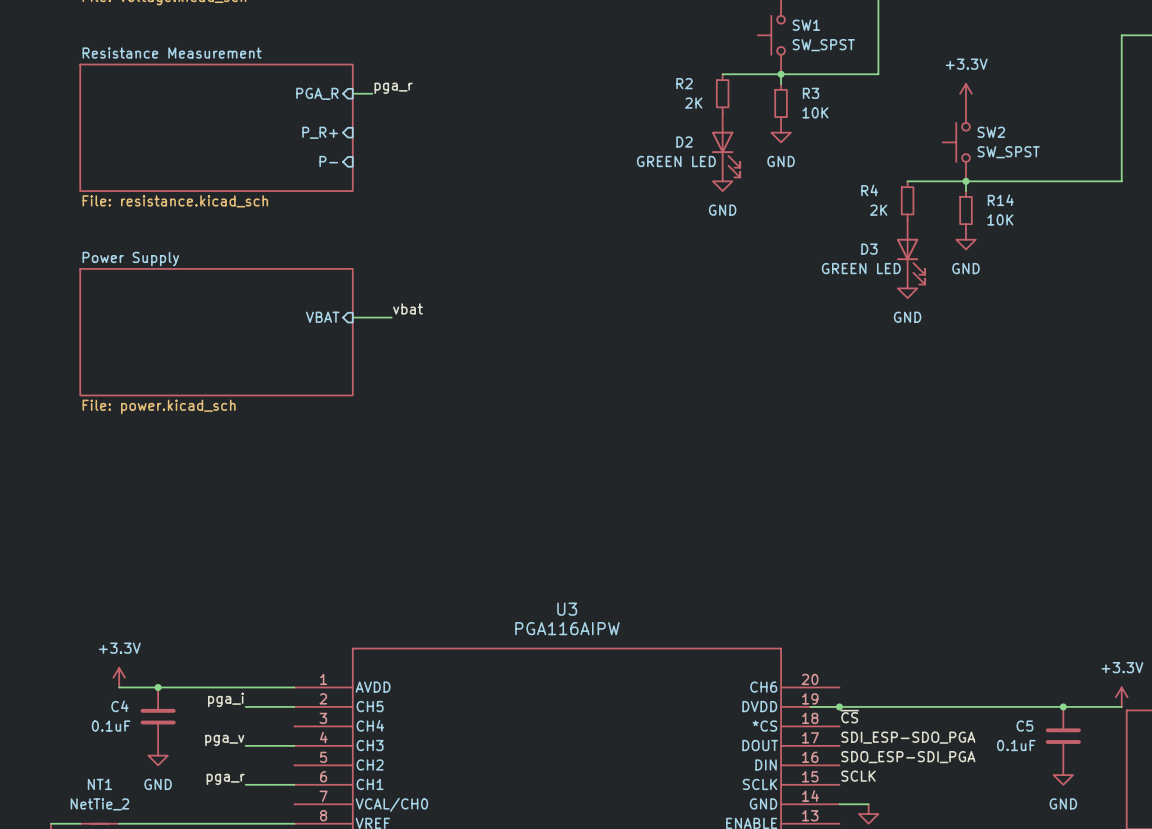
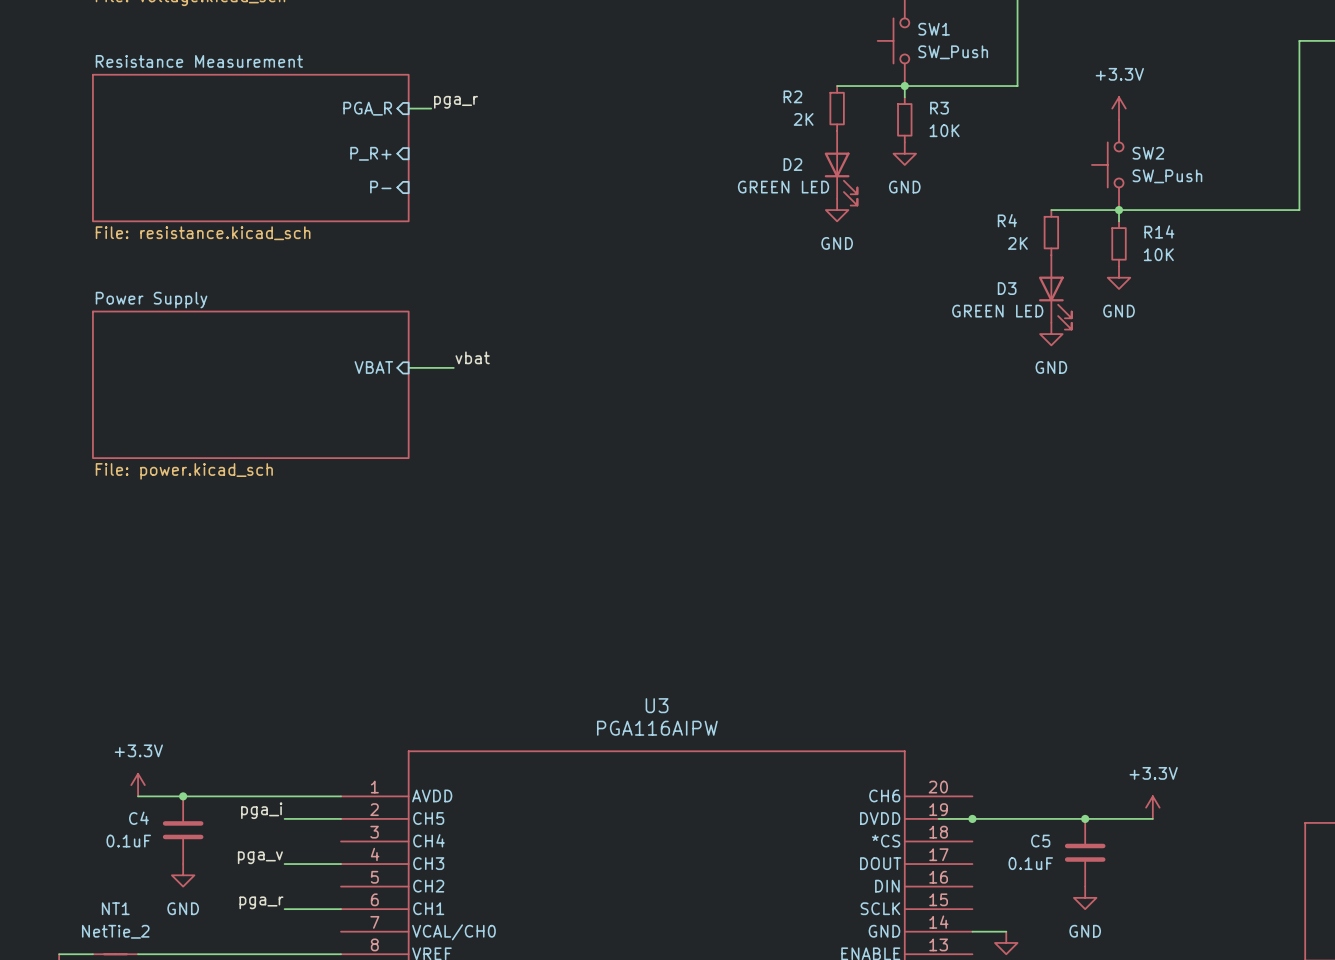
SW1 value: SW_SPST (823, 45) -> SW_Push (953, 52)
SW2 value: SW_SPST (1008, 152) -> SW_Push (1167, 176)
power symbol position: +3.3V (1121, 697) -> +3.3V (1152, 807)
junction: none -> (1085, 818)
wire: (995, 706) (1121, 706) -> none
junction: (1063, 706) -> none
label: ~{CS} (849, 716) -> none
C5 position: (1063, 736) -> (1085, 852)
label: SDI_ESP-SDO_PGA (908, 737) -> none
label: SDO_ESP-SDI_PGA (908, 757) -> none
power symbol position: GND (1063, 775) -> GND (1085, 897)
label: SCLK (858, 776) -> none

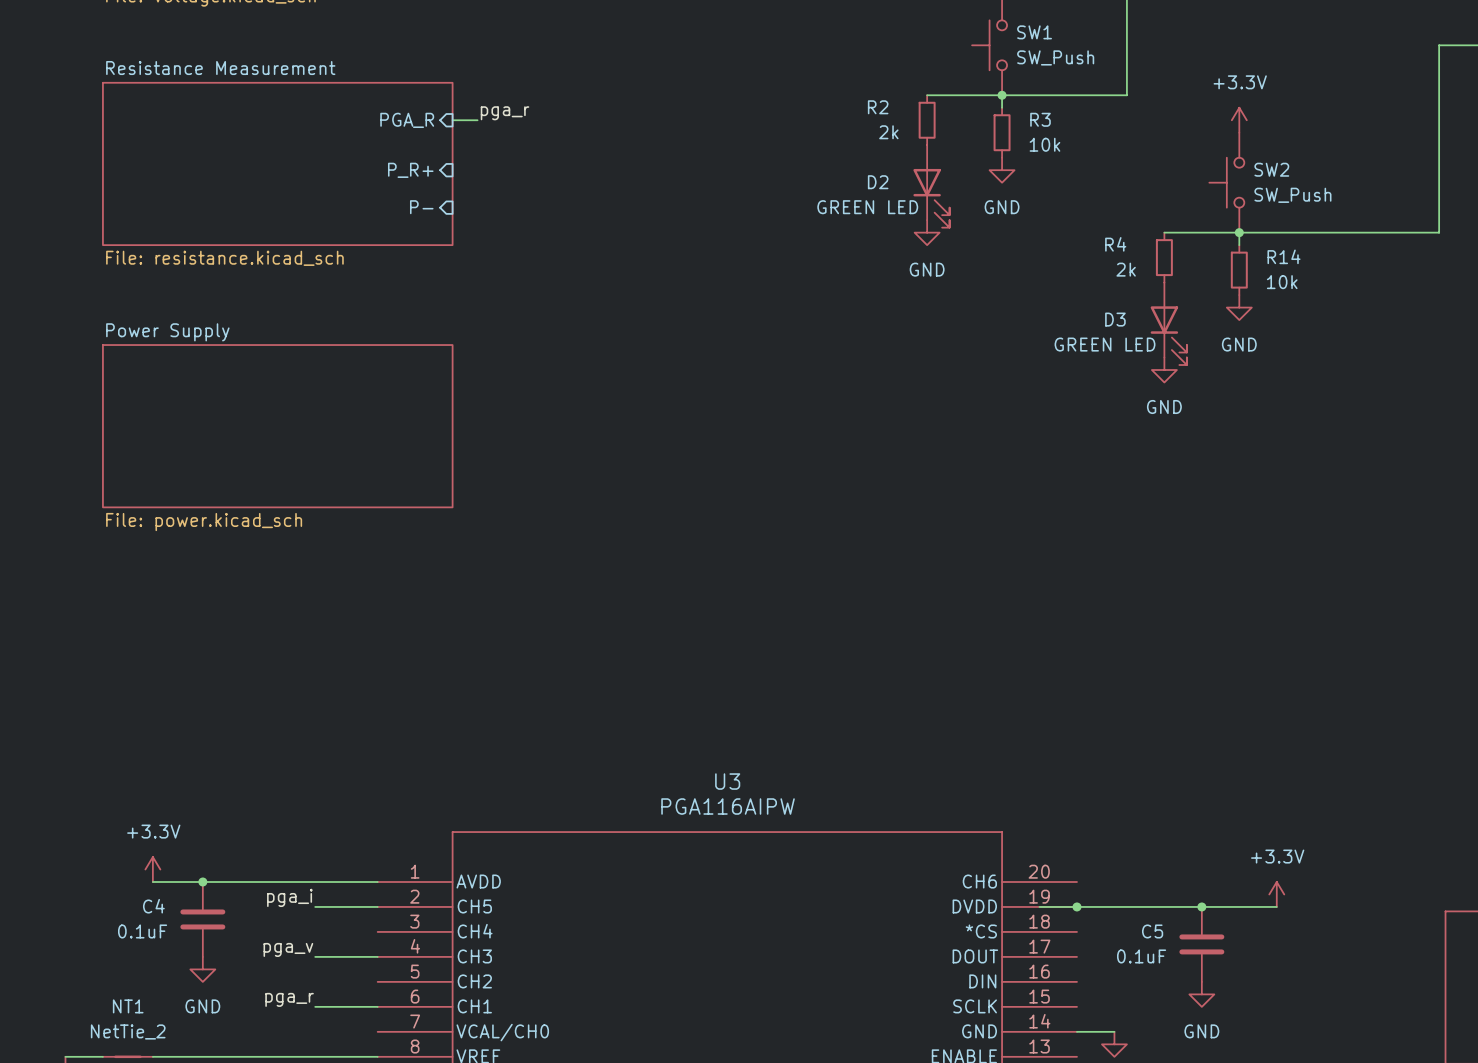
R2 value: 2K (803, 119) -> 2k (888, 132)
R3 value: 10K (944, 130) -> 10k (1044, 144)
R4 value: 2K (1017, 243) -> 2k (1126, 269)
R14 value: 10K (1158, 254) -> 10k (1282, 282)
label: vbat (472, 357) -> none
sheet pin: VBAT (373, 367) -> none
wire: (408, 367) (453, 367) -> none

